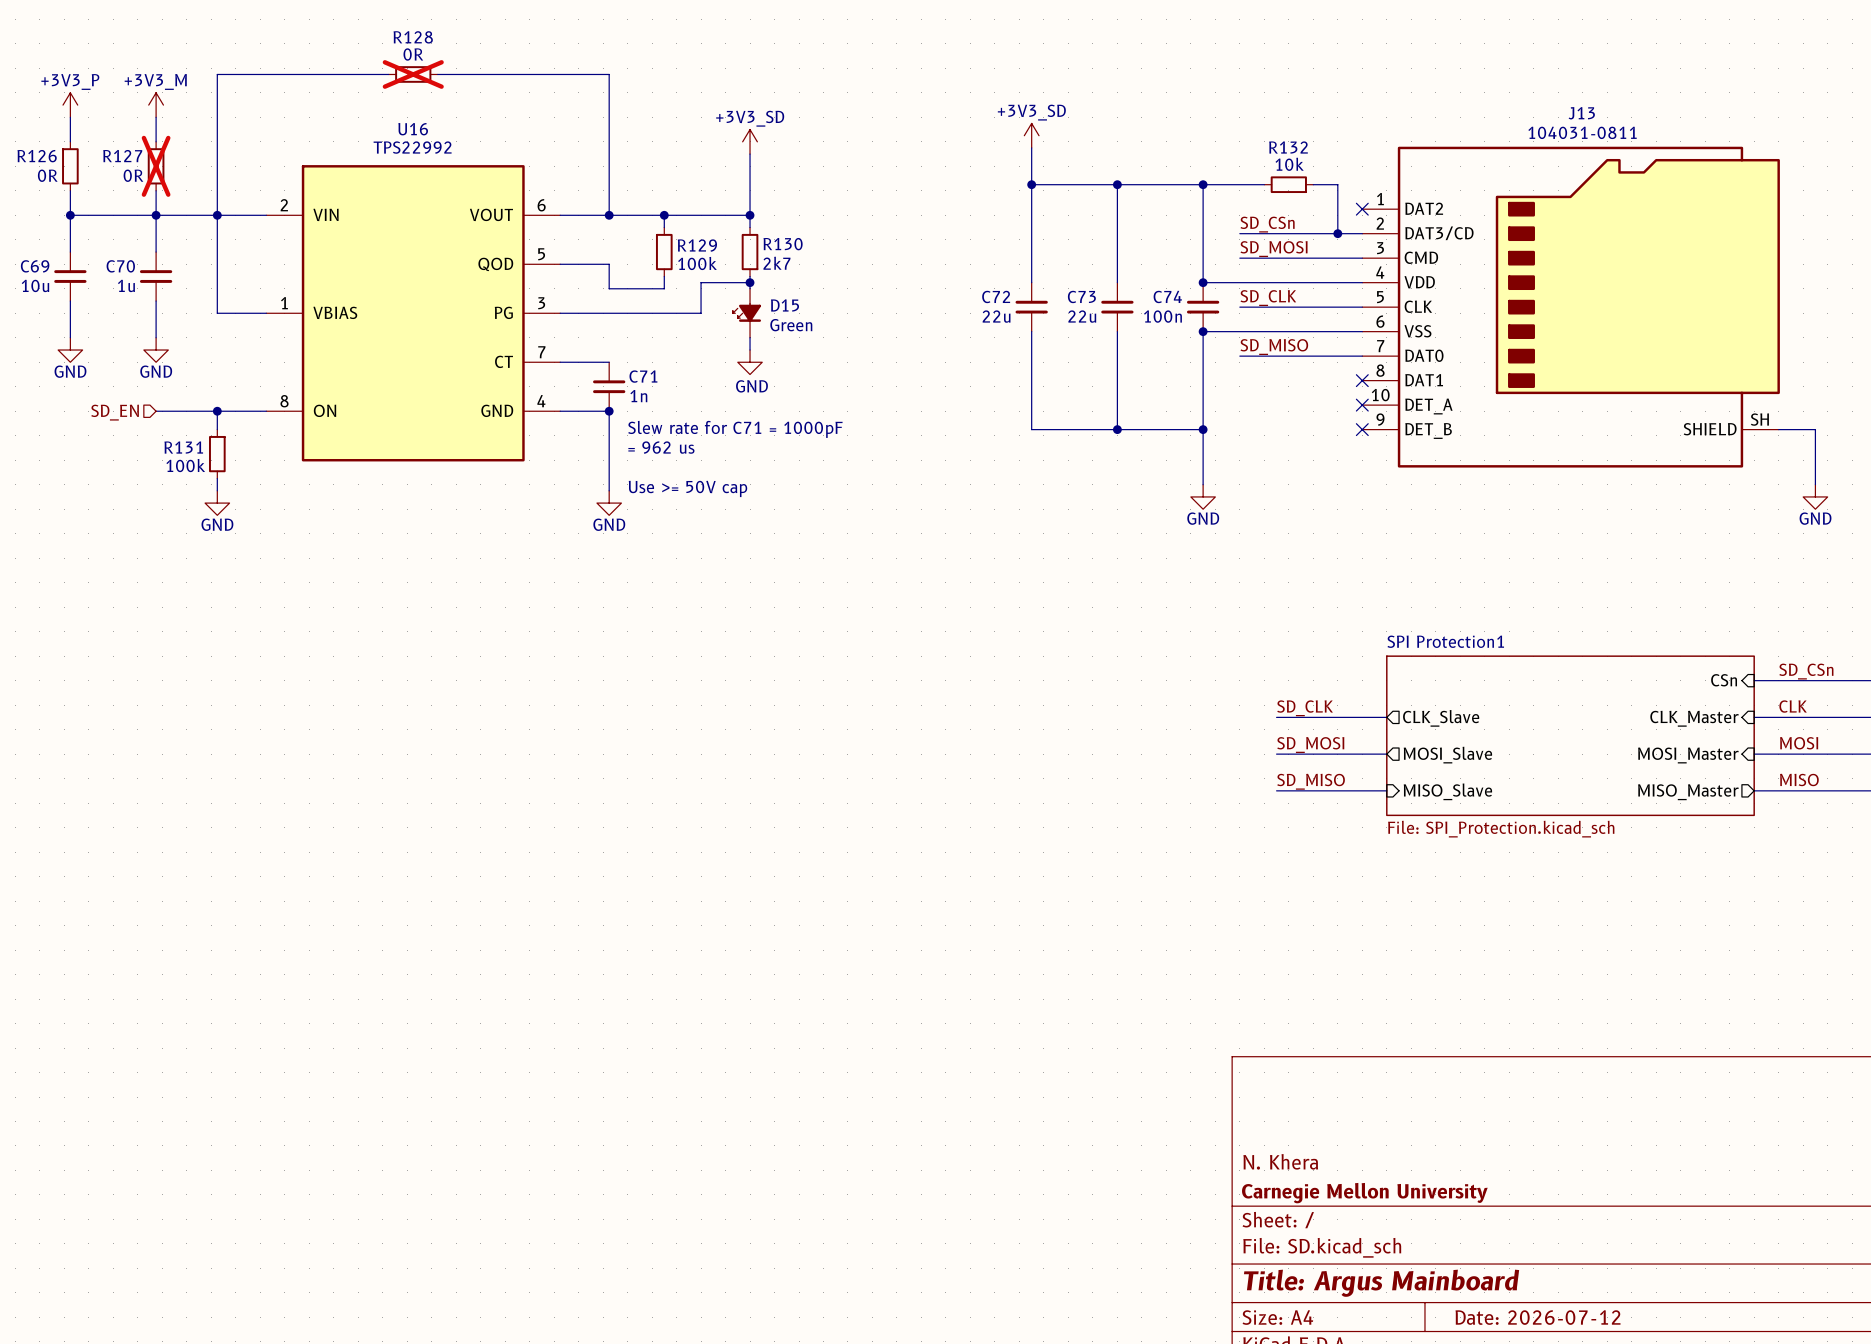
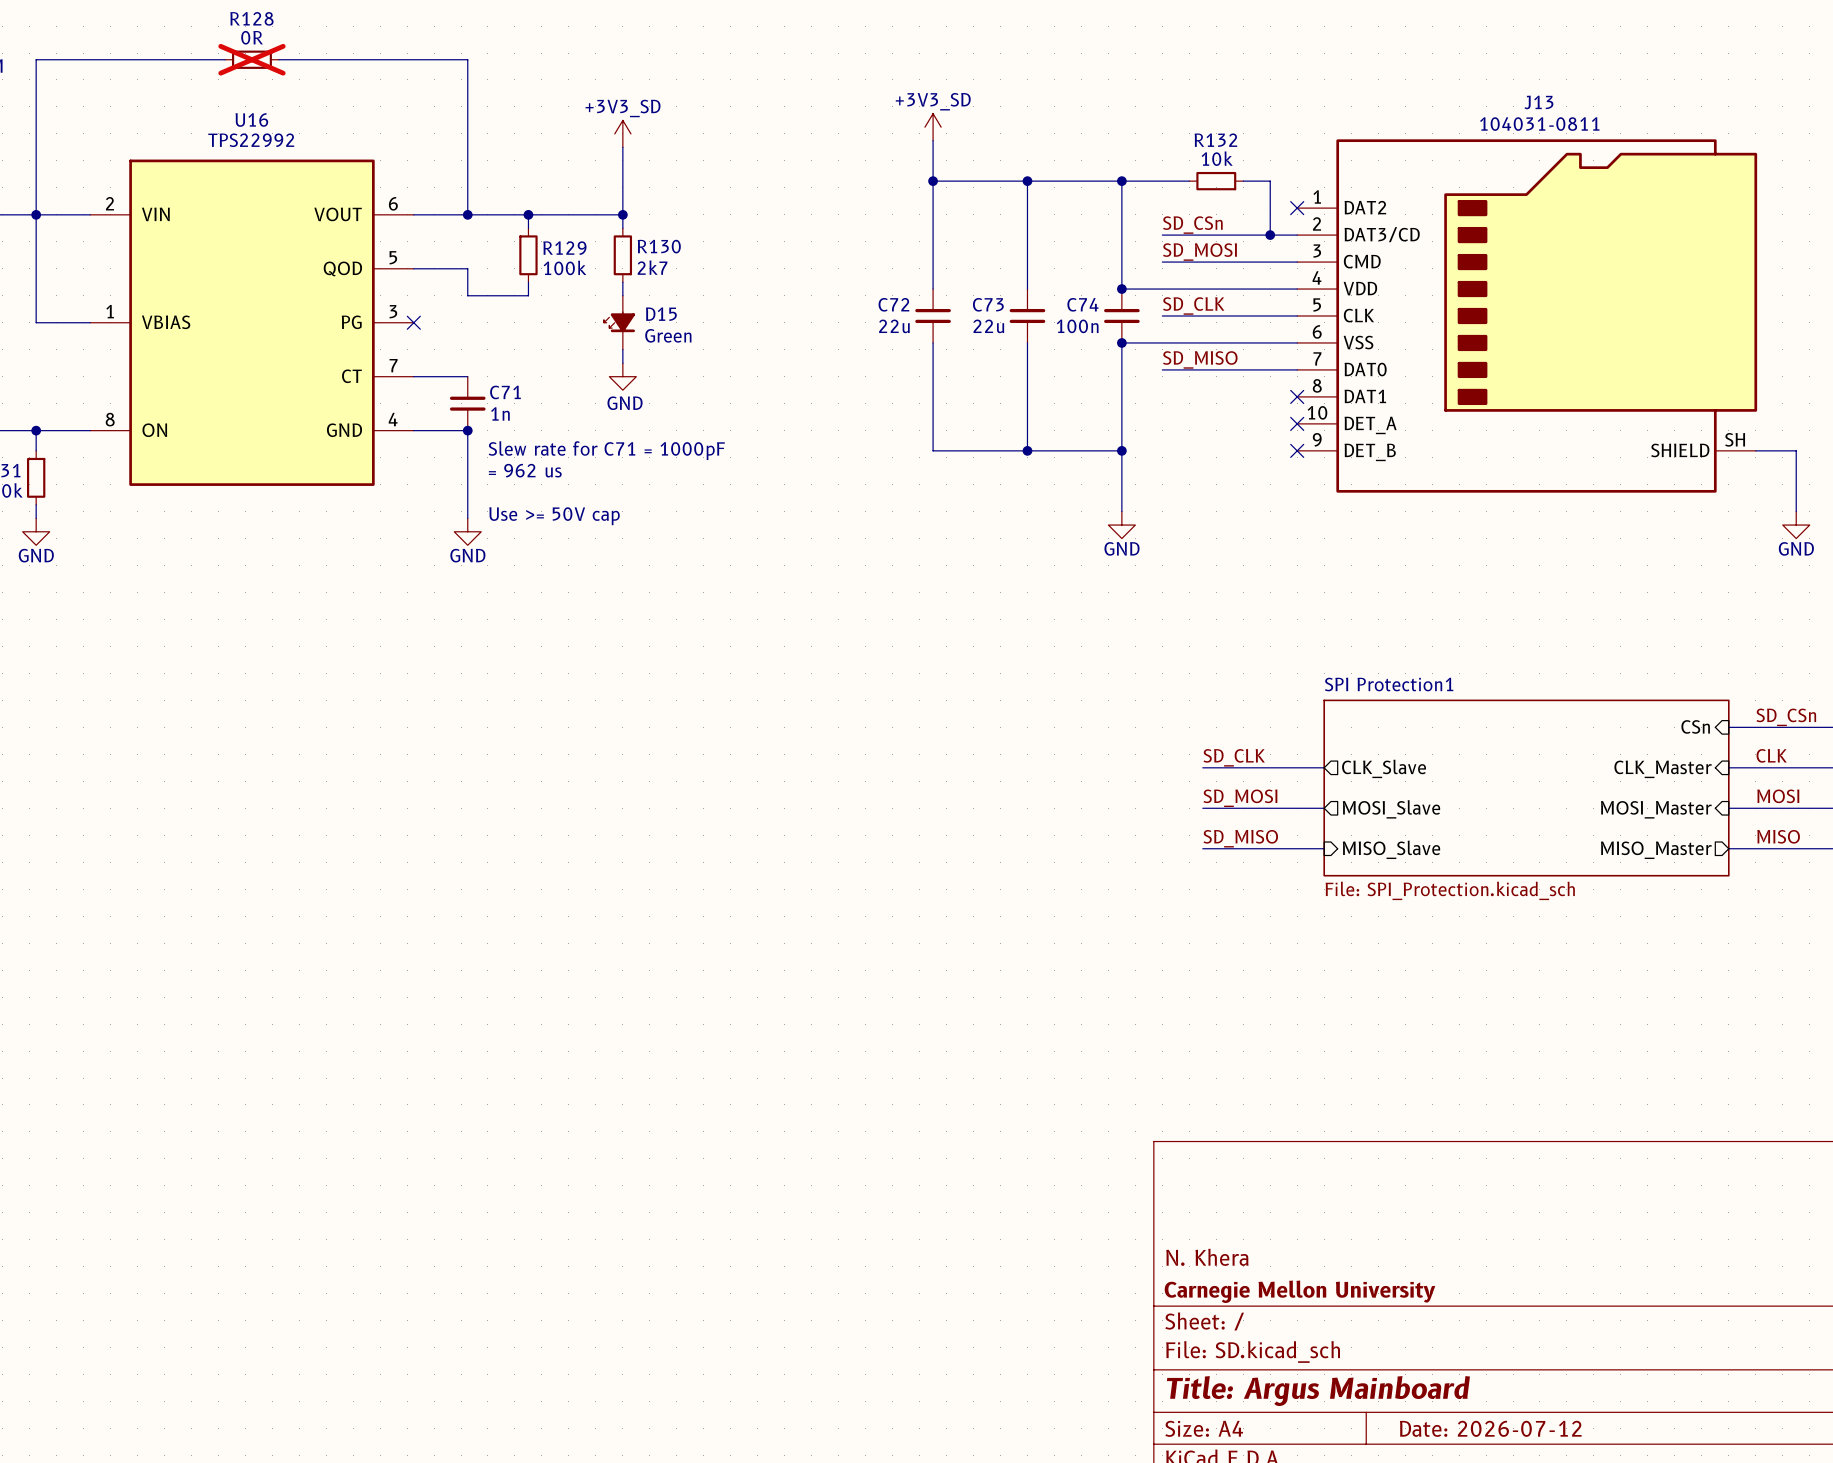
wire: (750, 282) (701, 282) (701, 313) (560, 313) -> none
junction: (750, 282) -> none
no-connect mark: none -> (413, 322)

